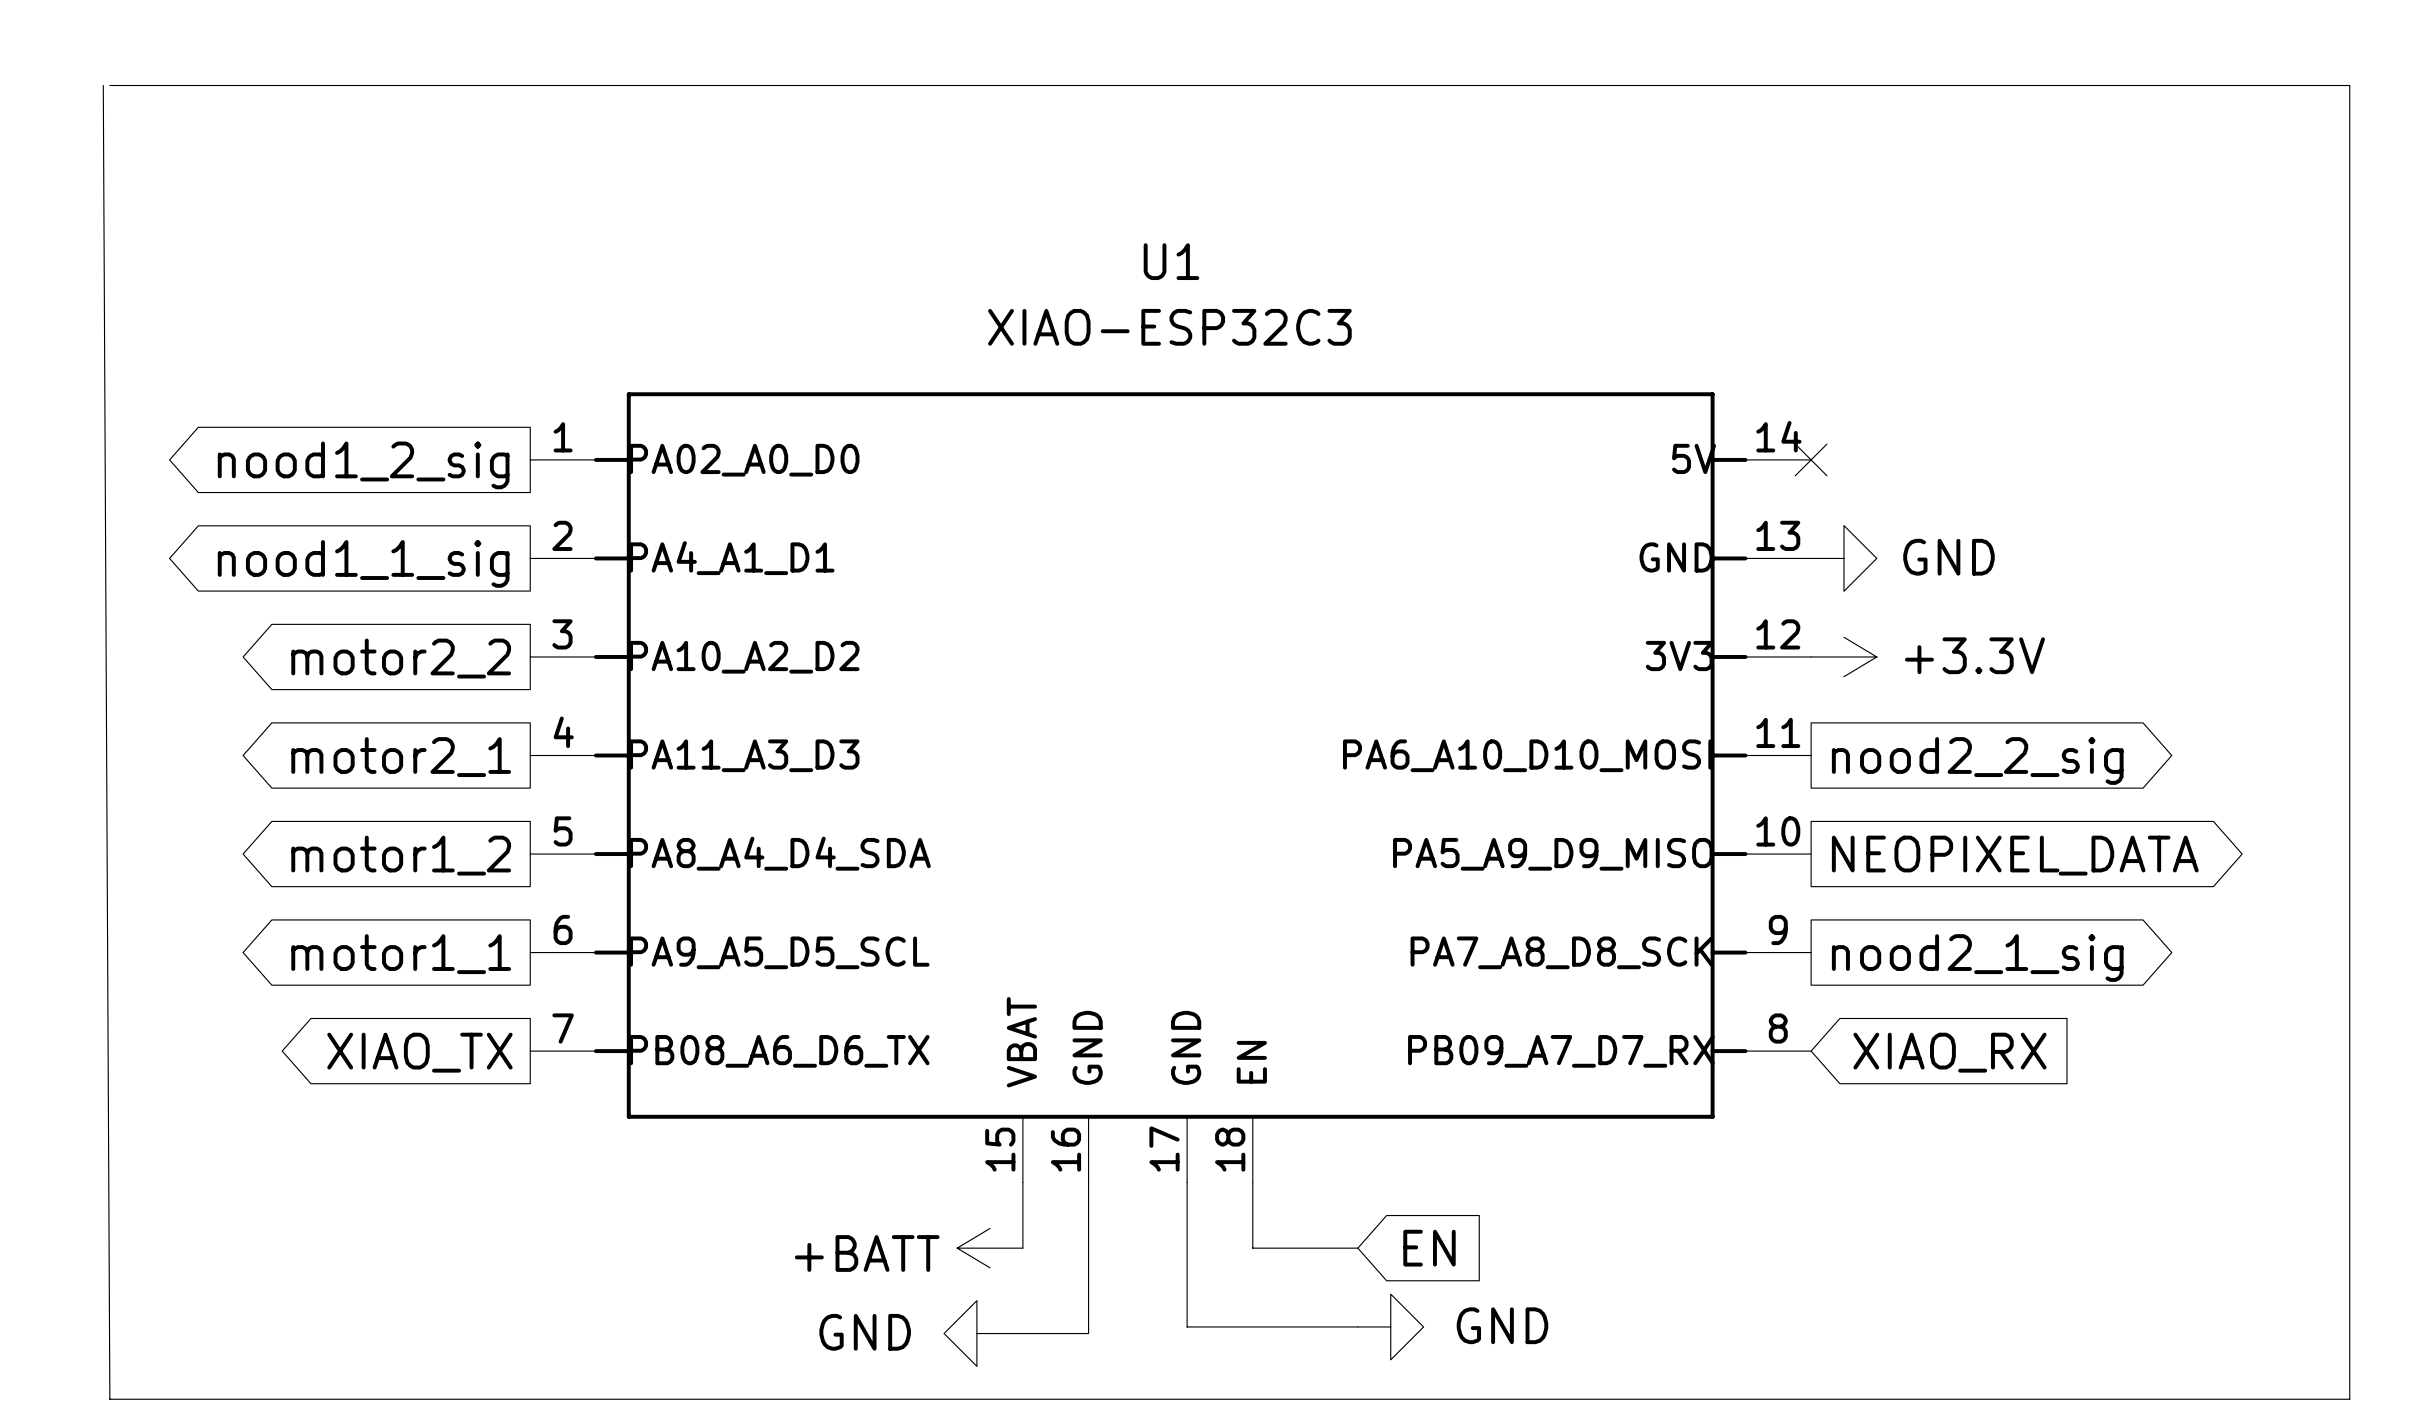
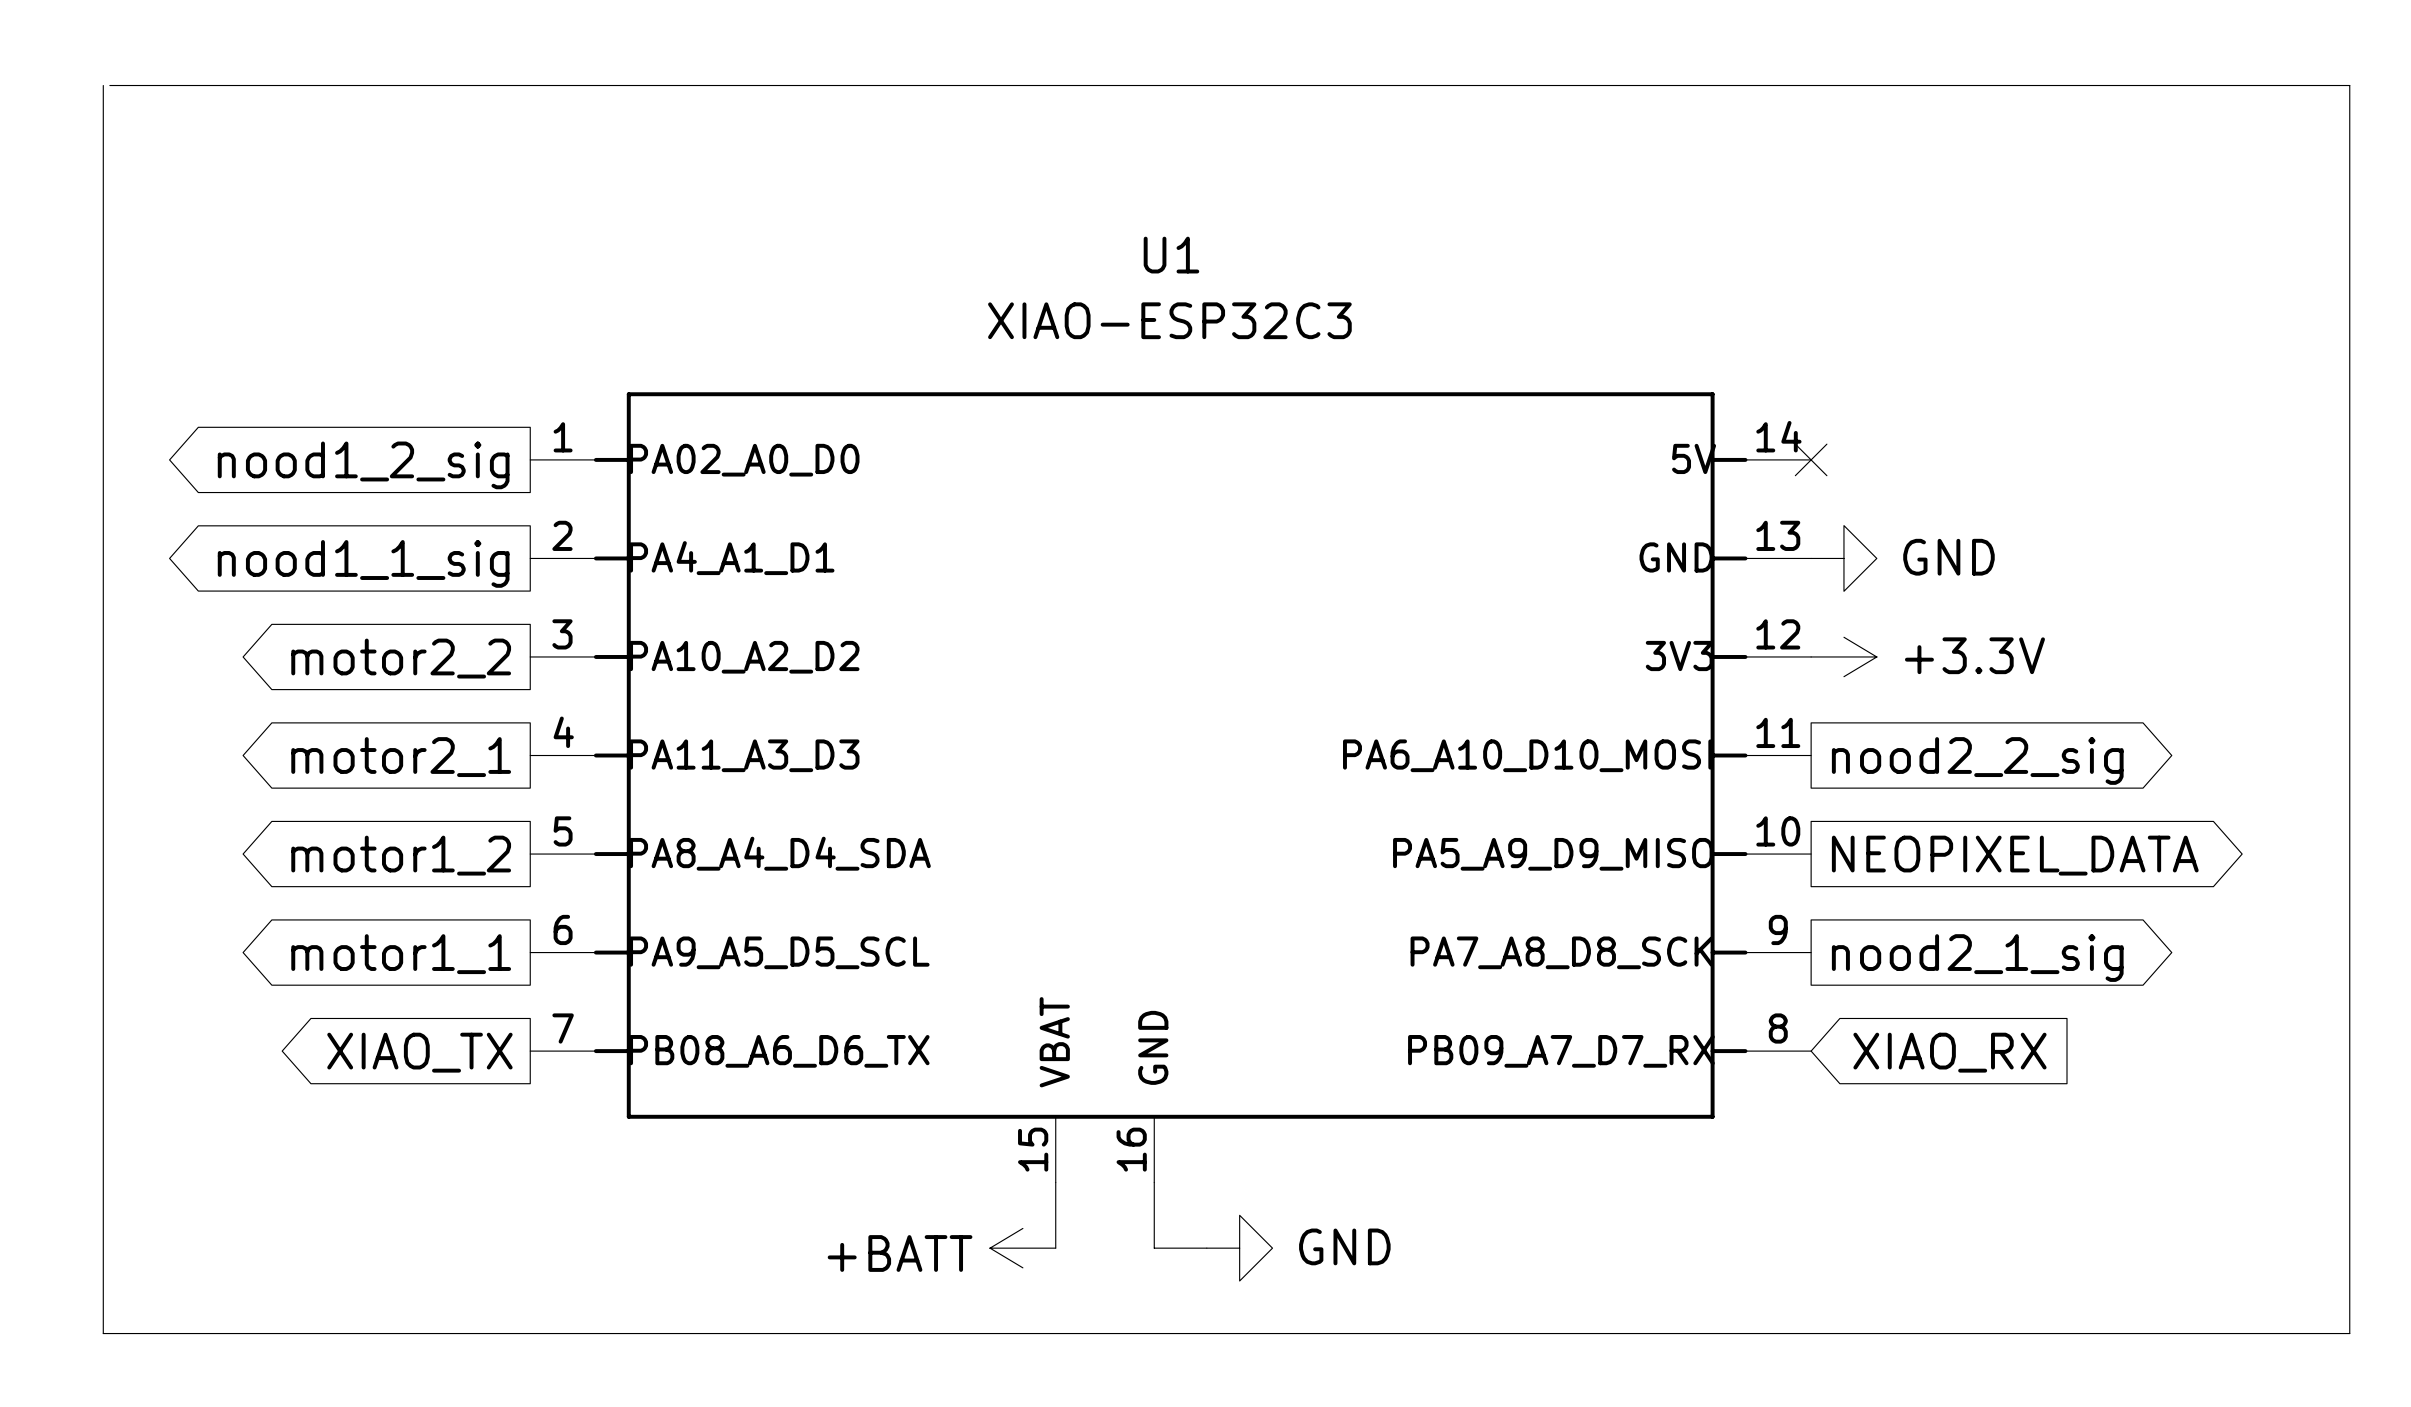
line: (103, 85) (109, 1399) (2349, 1399) (2349, 1333) -> (103, 85) (103, 1333) (2349, 1333)
U1 symbol: [530, 392, 1812, 1183] -> [530, 392, 1812, 1183]
wire: (1022, 1182) (1022, 1248) -> (1055, 1182) (1055, 1248)
wire: (1088, 1182) (1088, 1333) (1009, 1333) -> none
wire: none -> (1154, 1182) (1154, 1248) (1206, 1248)
wire: (1187, 1182) (1187, 1326) (1357, 1326) -> none
wire: (1252, 1182) (1252, 1248) (1357, 1248) -> none
power symbol position: +BATT (990, 1248) -> +BATT (1022, 1248)
power symbol: none -> GND (1239, 1248)
global label: EN (1429, 1248) -> none
power symbol: GND (1390, 1326) -> none
power symbol: GND (976, 1333) -> none

